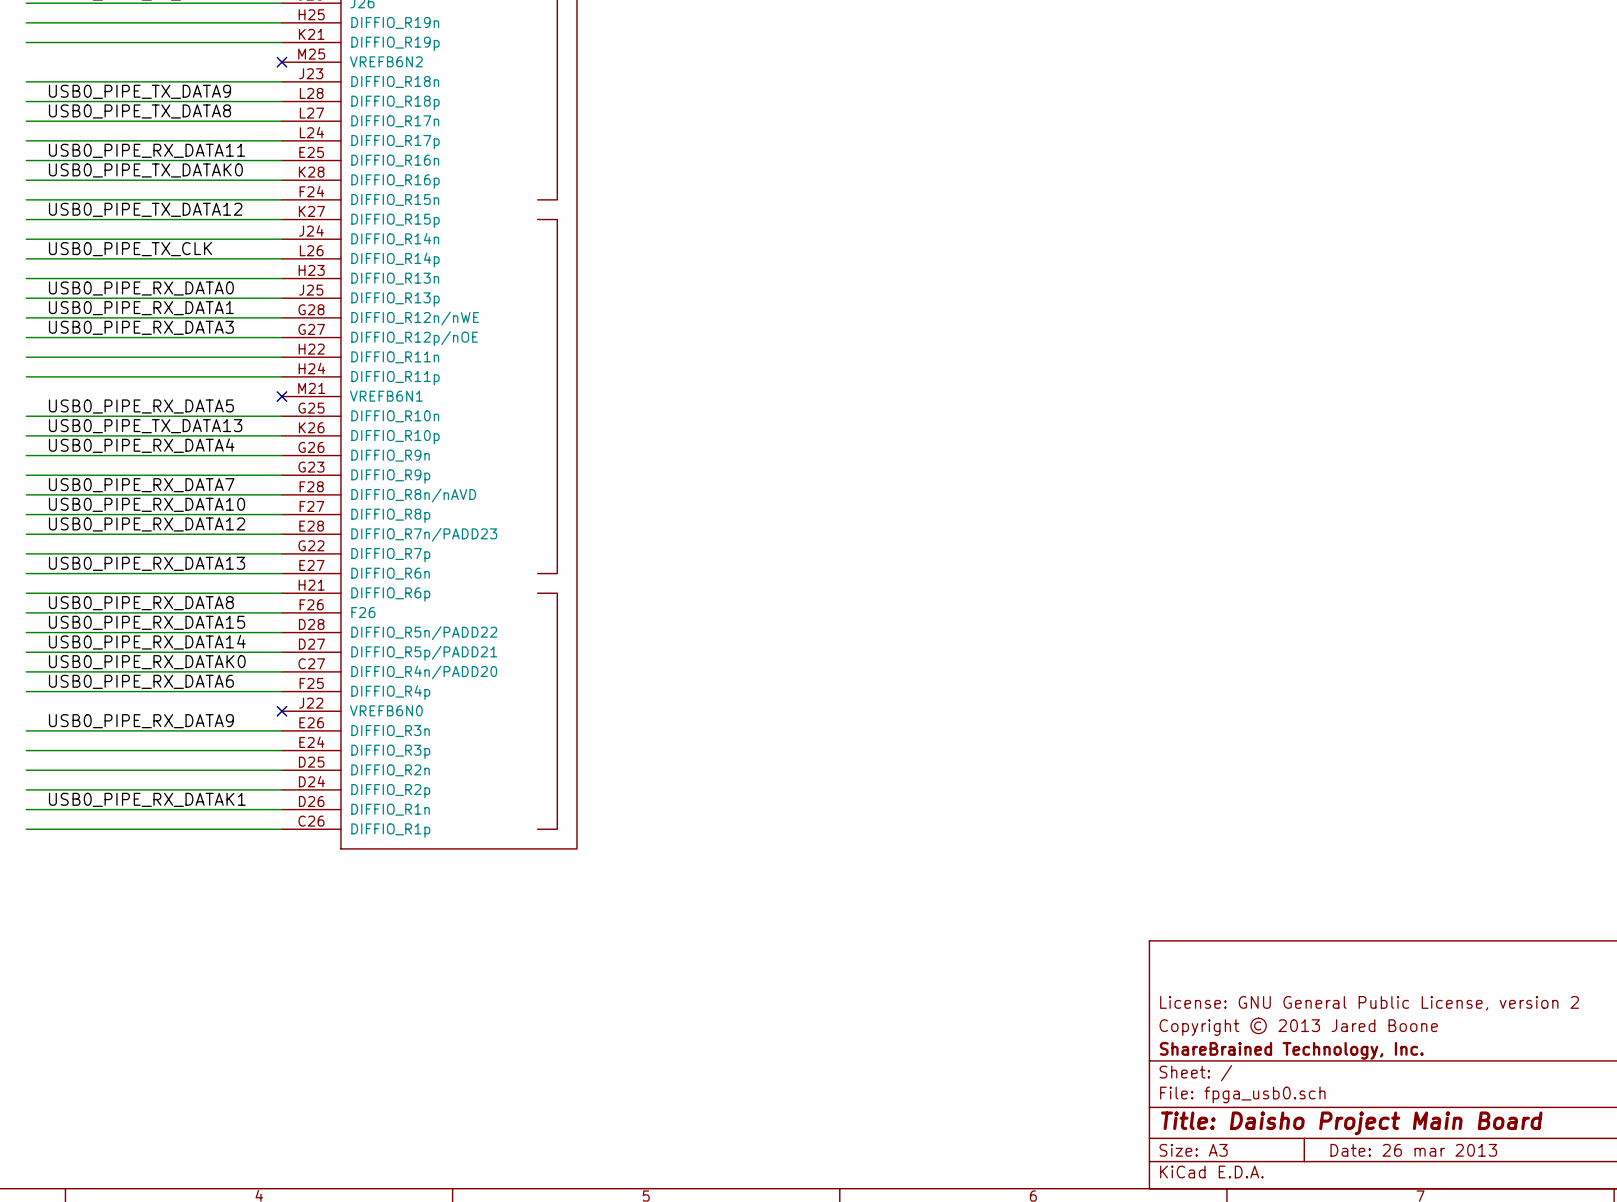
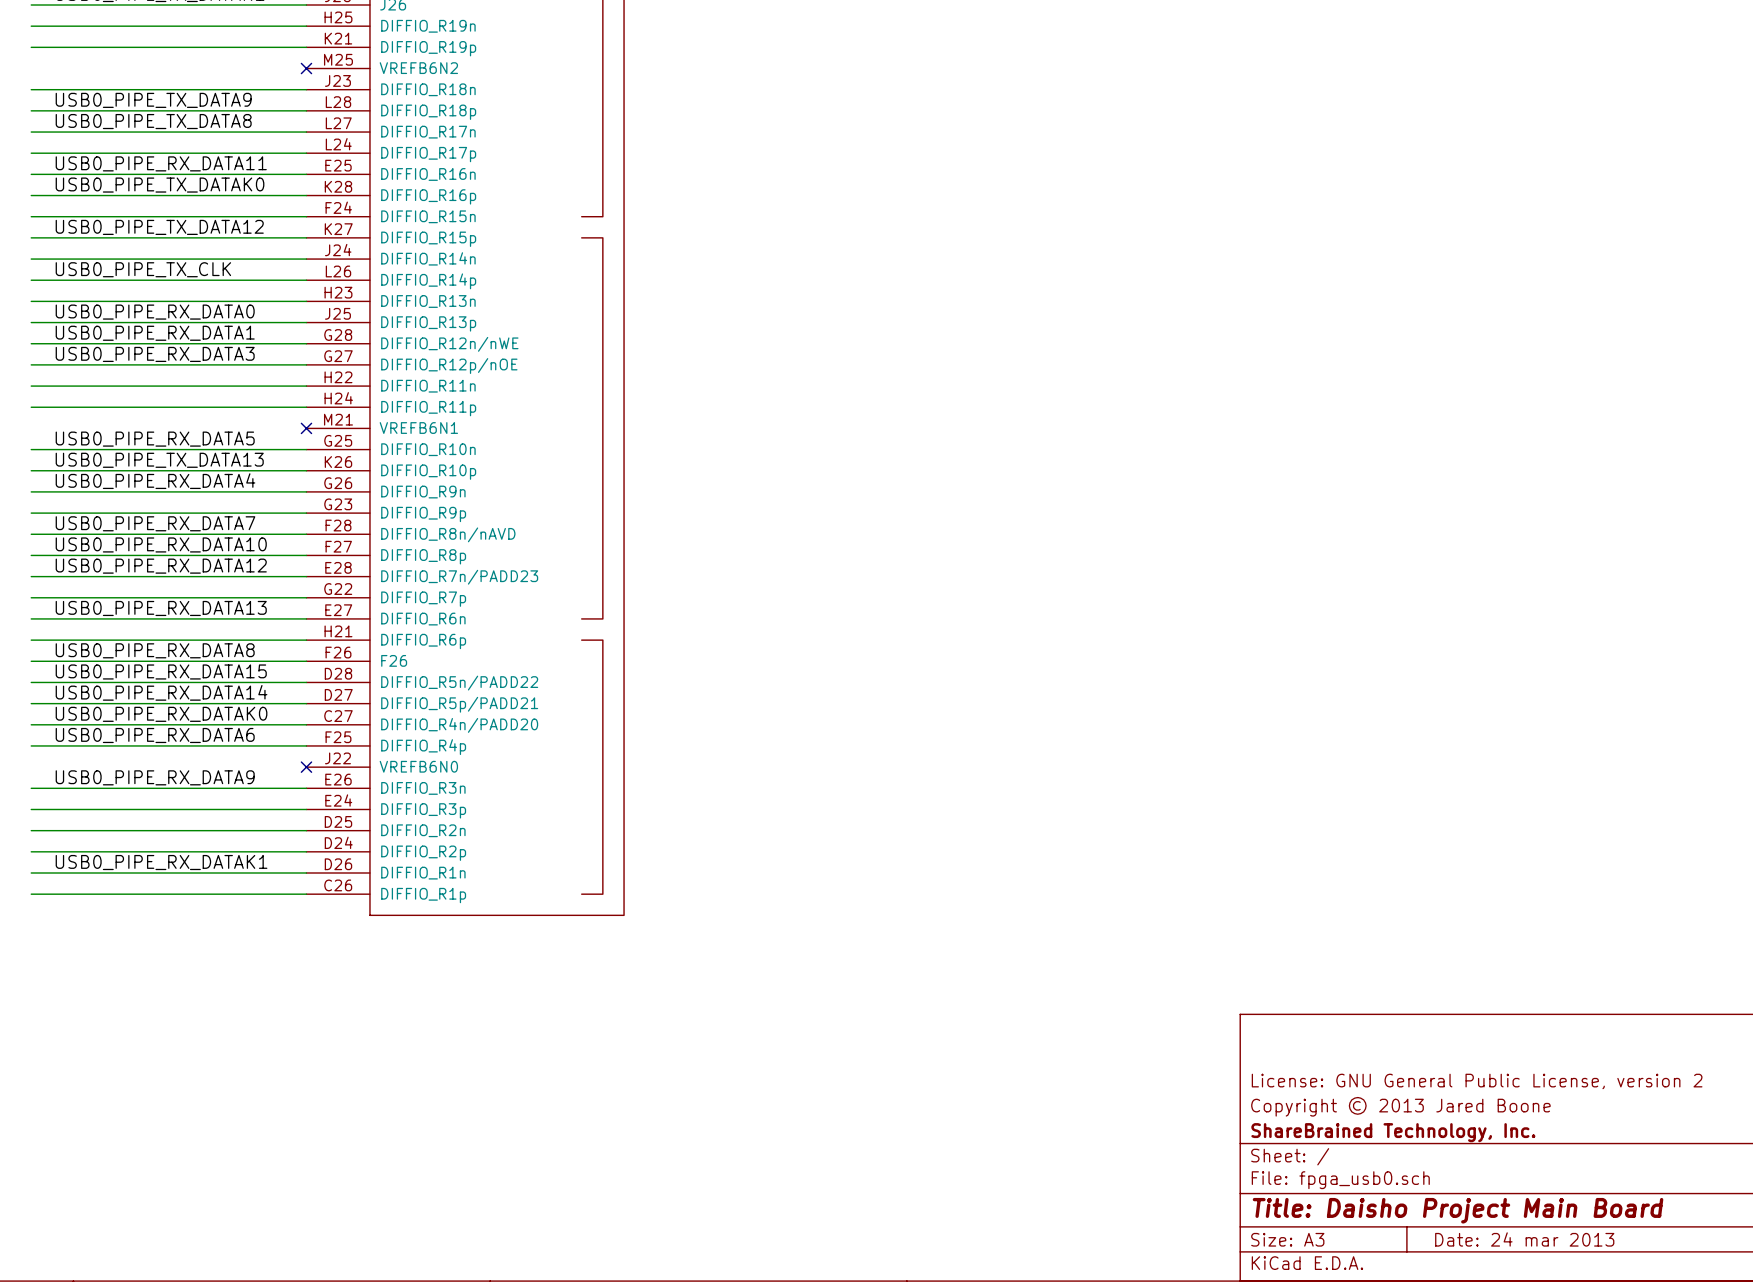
title block: Date: 26 mar 2013 (1413, 1150) -> Date: 24 mar 2013 (1524, 1239)

